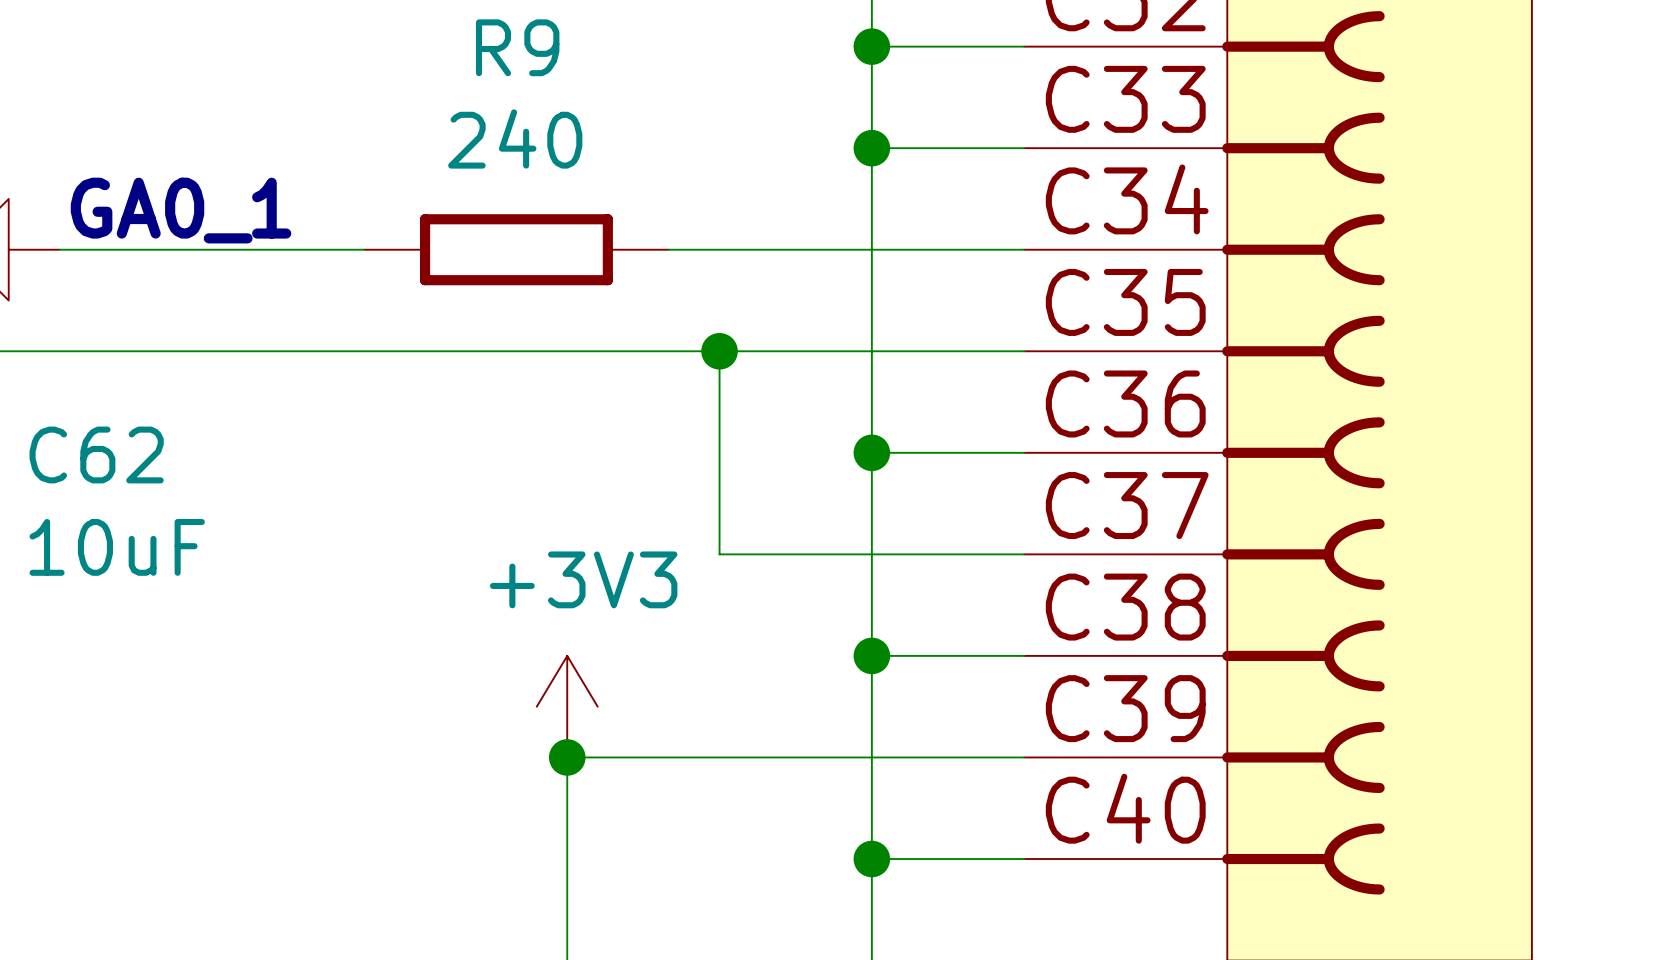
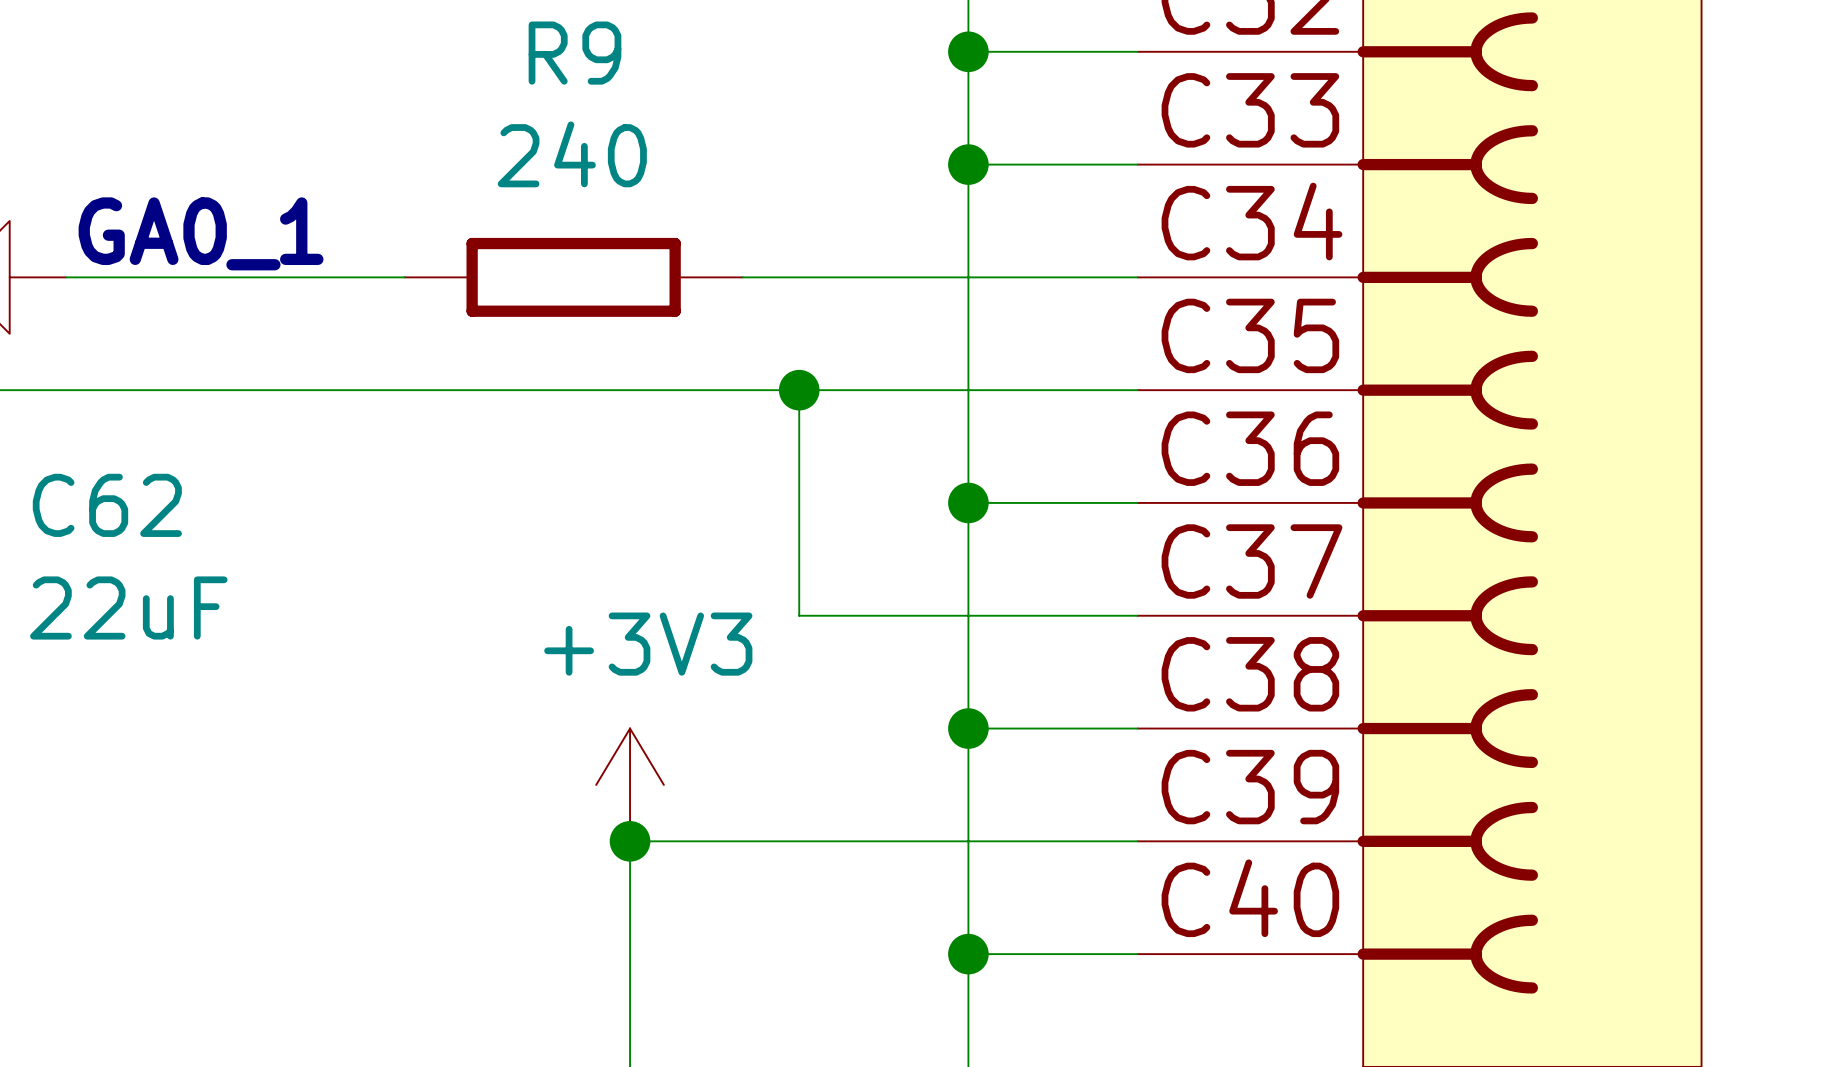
C62 text: 10uF (117, 547) -> 22uF (128, 608)

